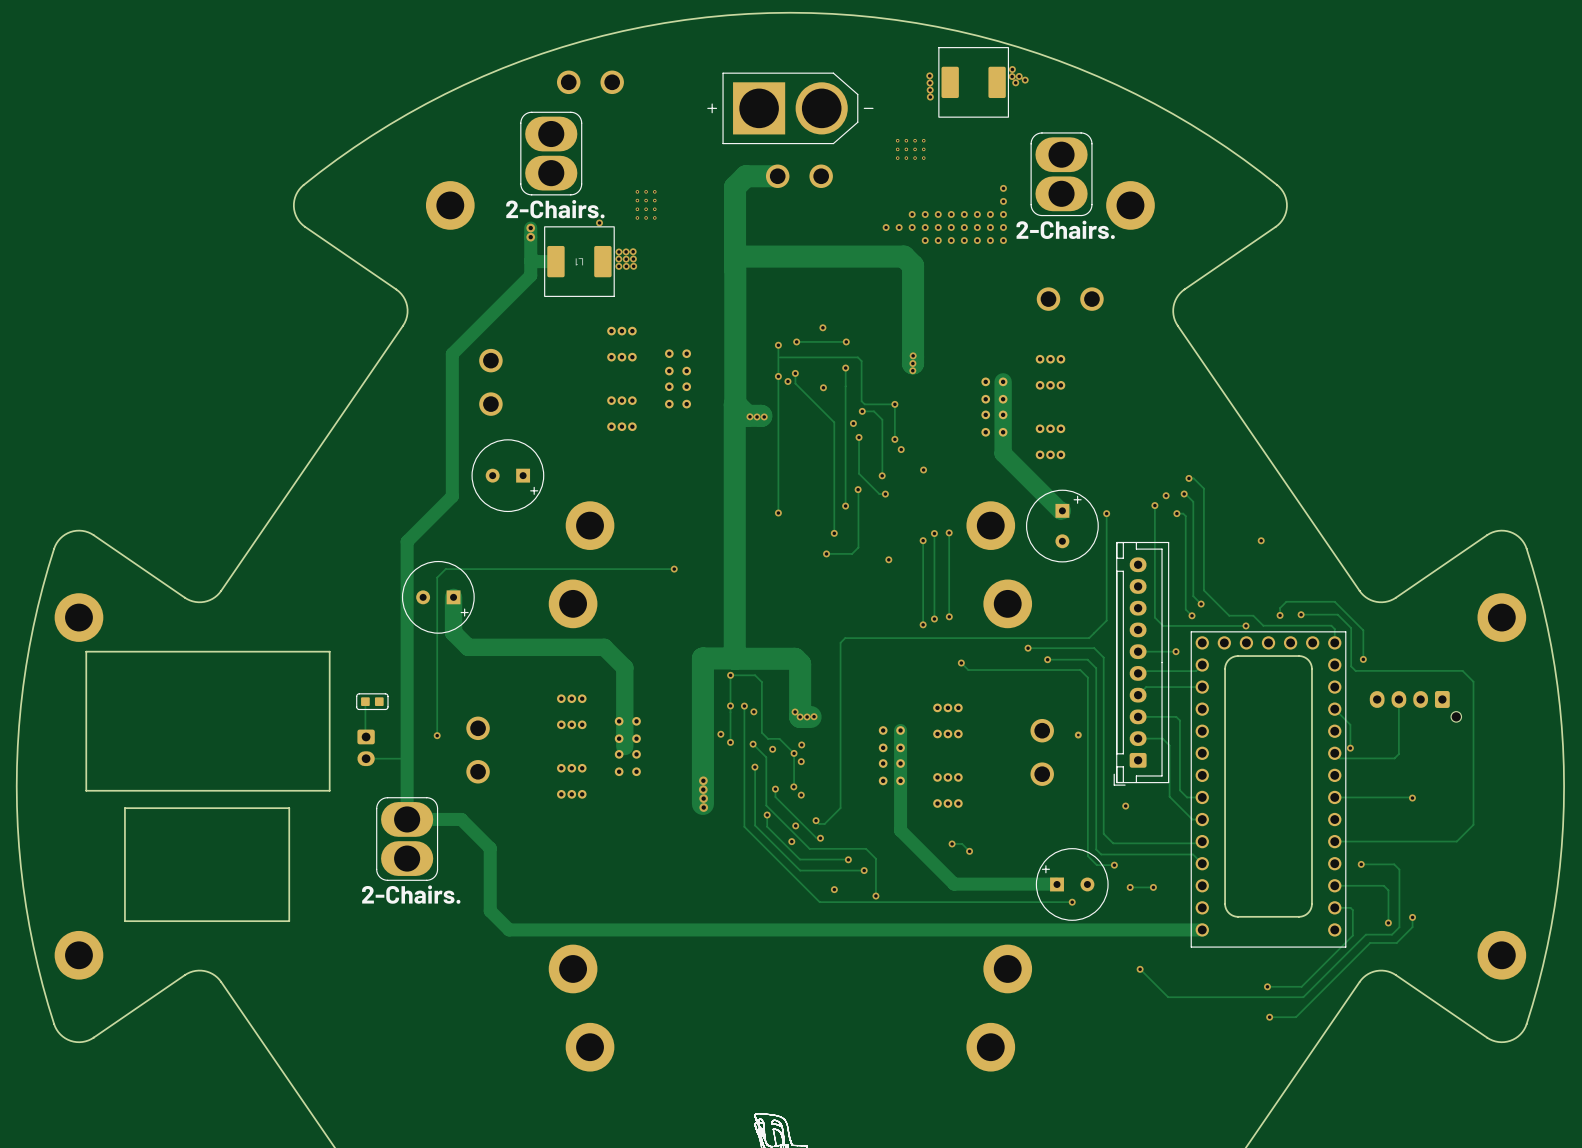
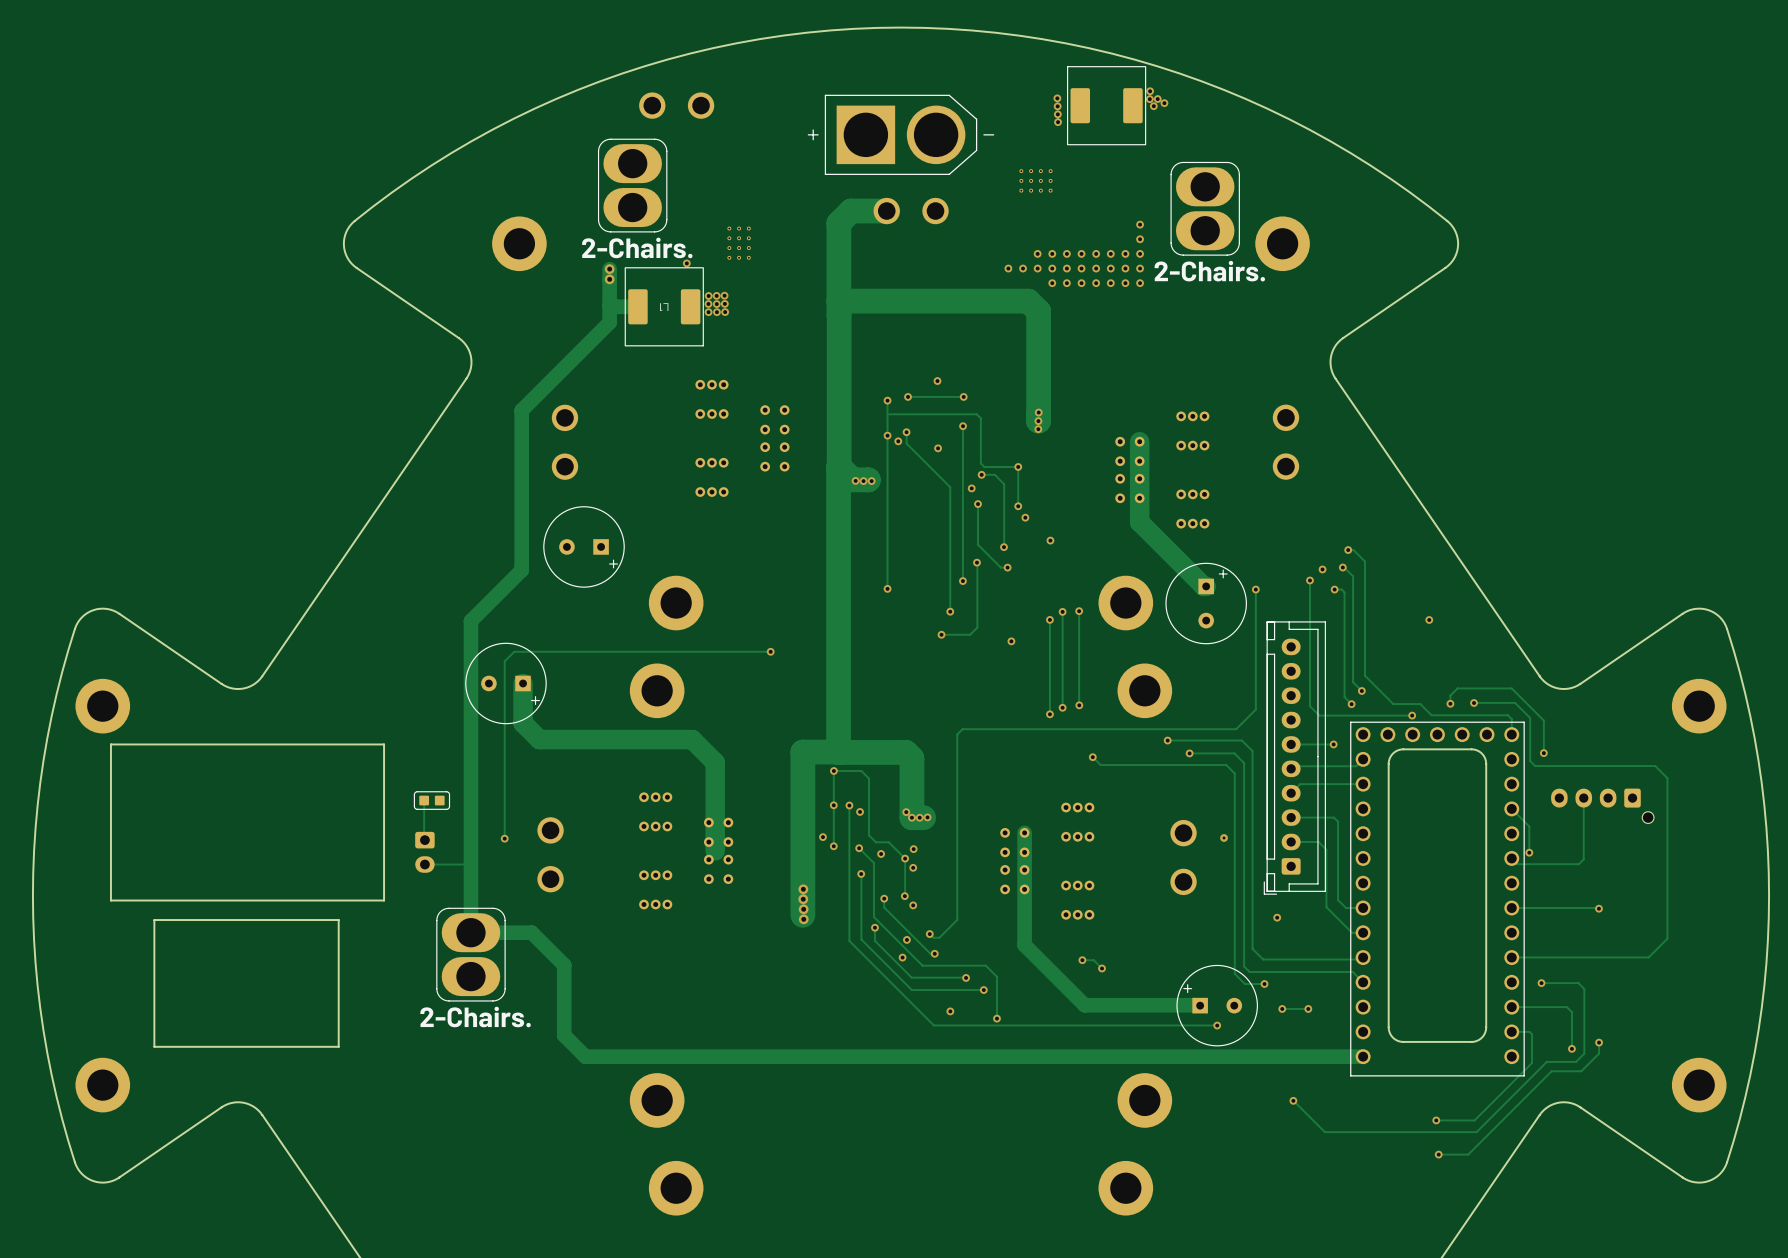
part rotation: 0° (1070, 299) -> 90° clockwise (1285, 442)
part position: (1070, 299) -> (1285, 442)

